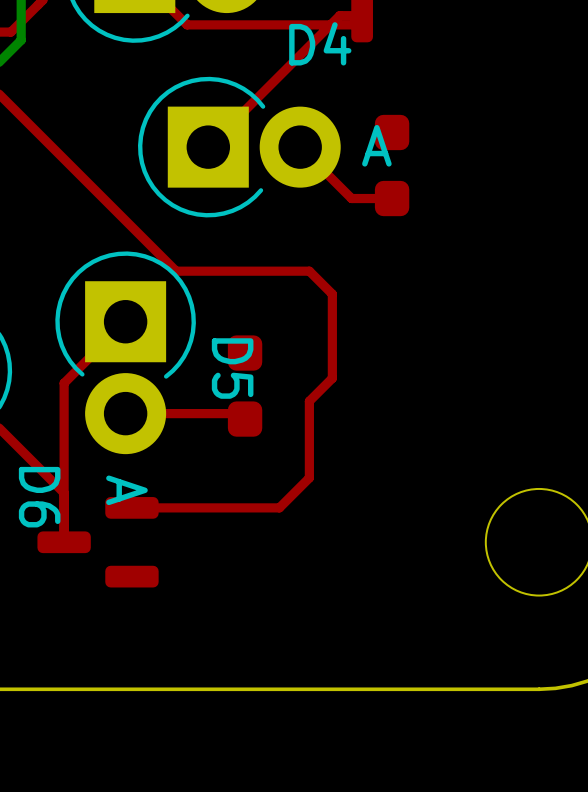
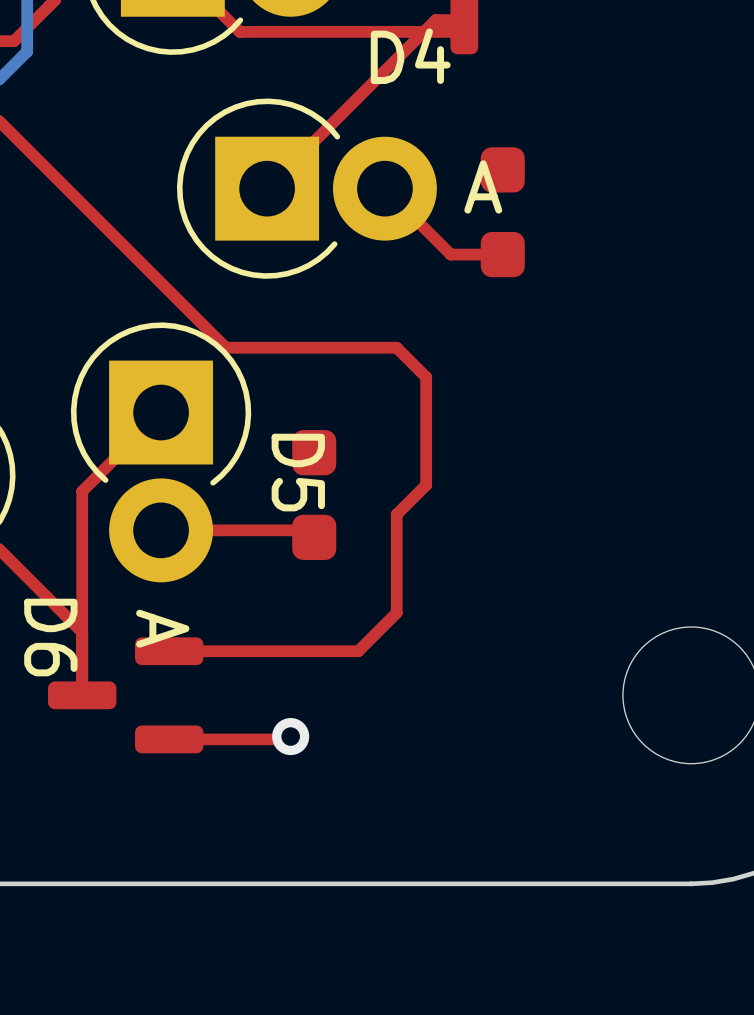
top track: none -> (290, 736) (287, 739) (169, 739)
via: none -> (290, 736)

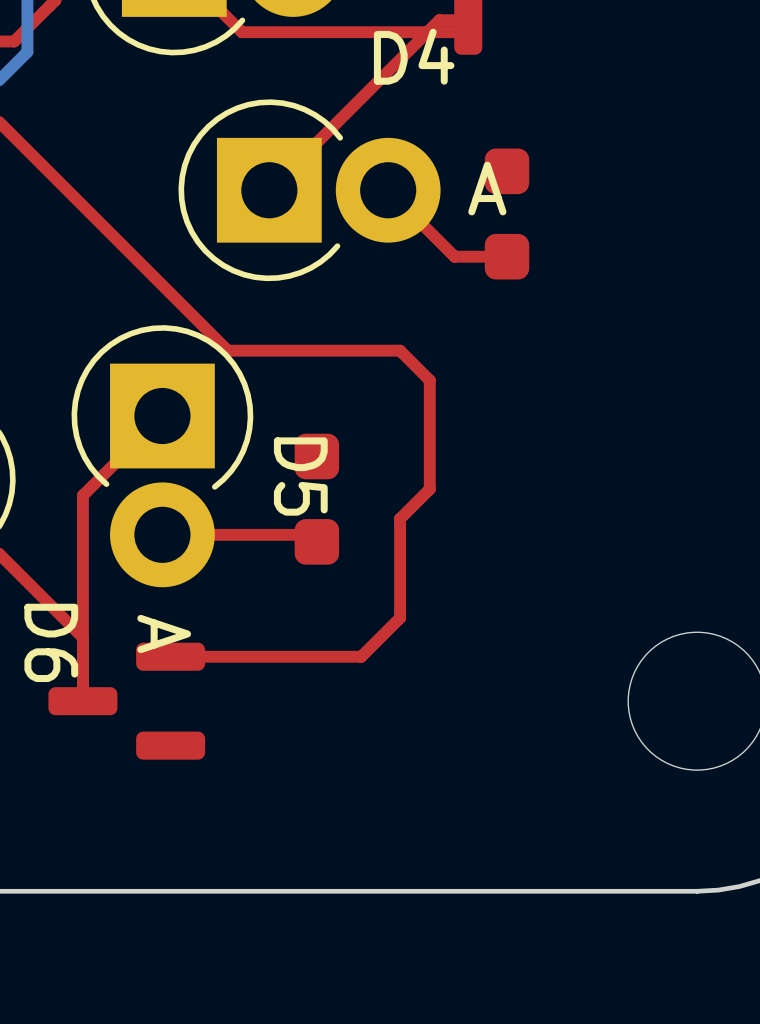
top track: (290, 736) (287, 739) (169, 739) -> none
via: (290, 736) -> none

